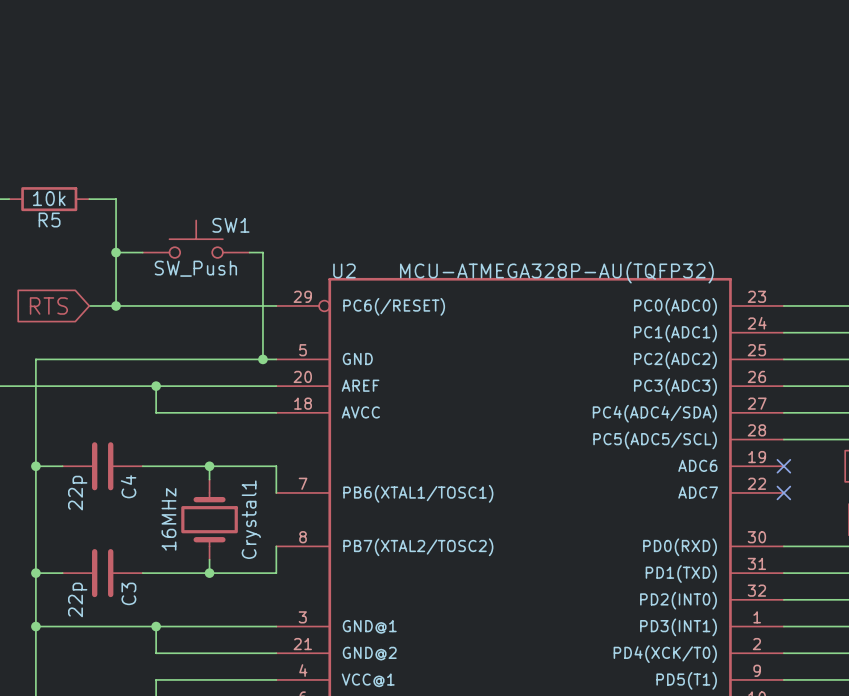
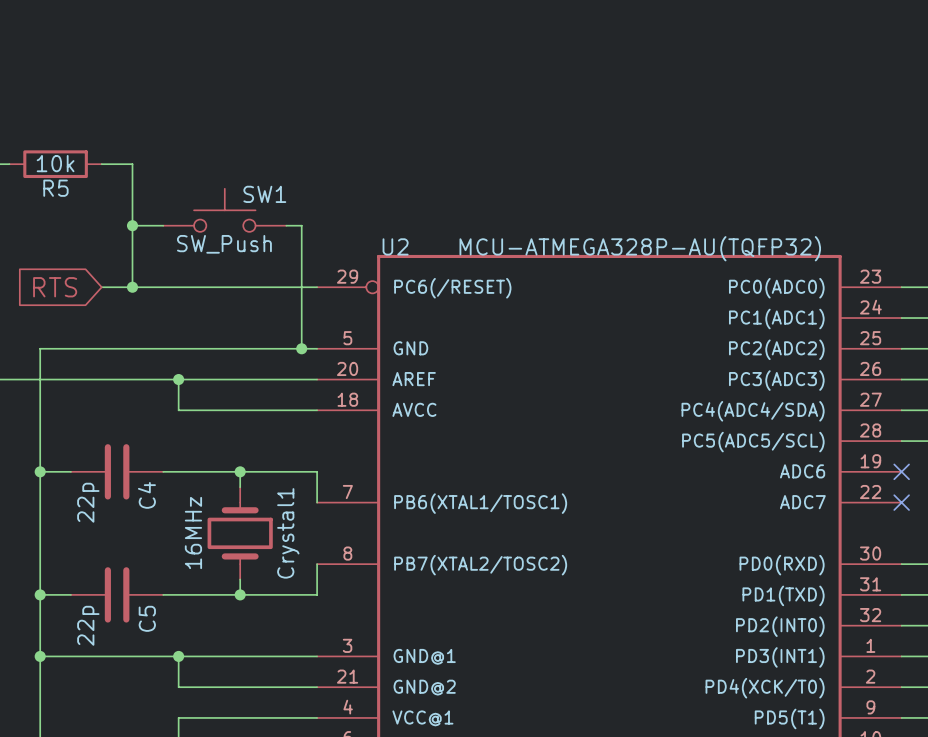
C3 name: C3 (128, 593) -> C5 (147, 618)

